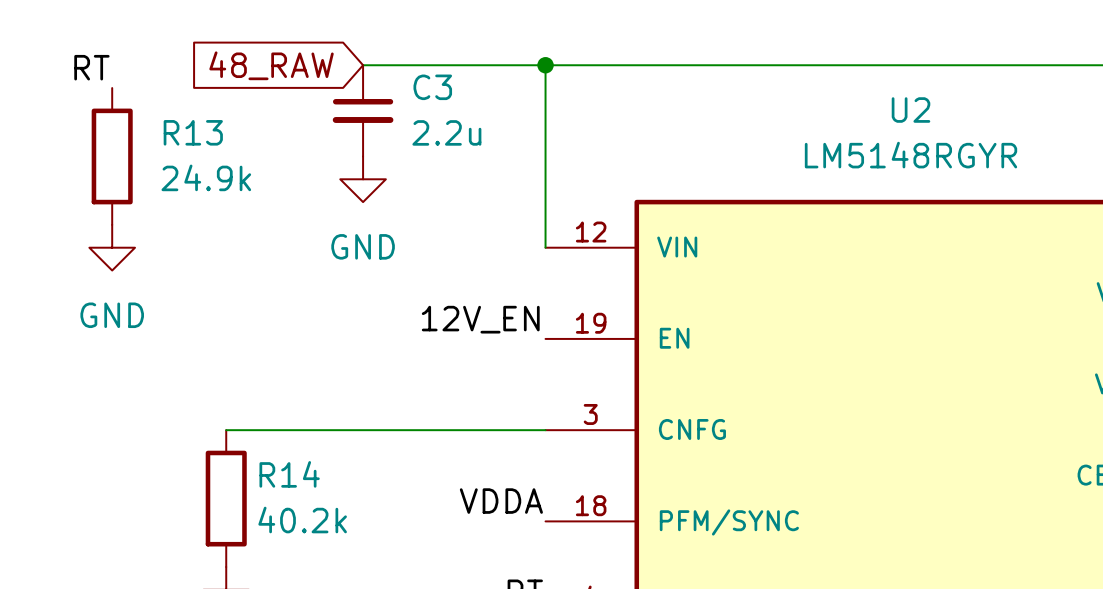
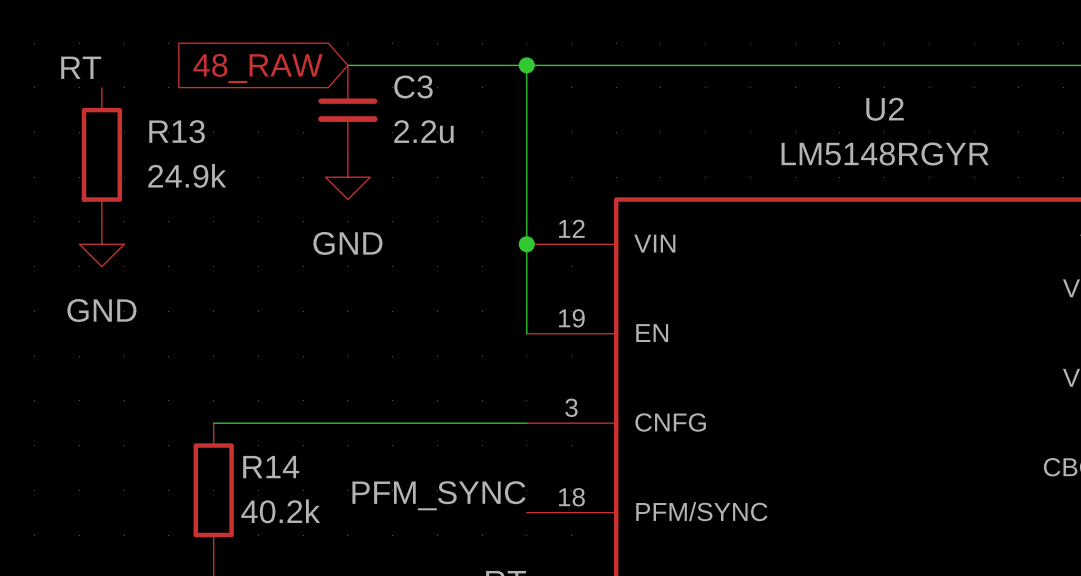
wire: none -> (526, 244) (526, 333)
junction: none -> (526, 244)
label: 12V_EN (480, 319) -> none
label: VDDA (501, 501) -> PFM_SYNC (438, 495)

